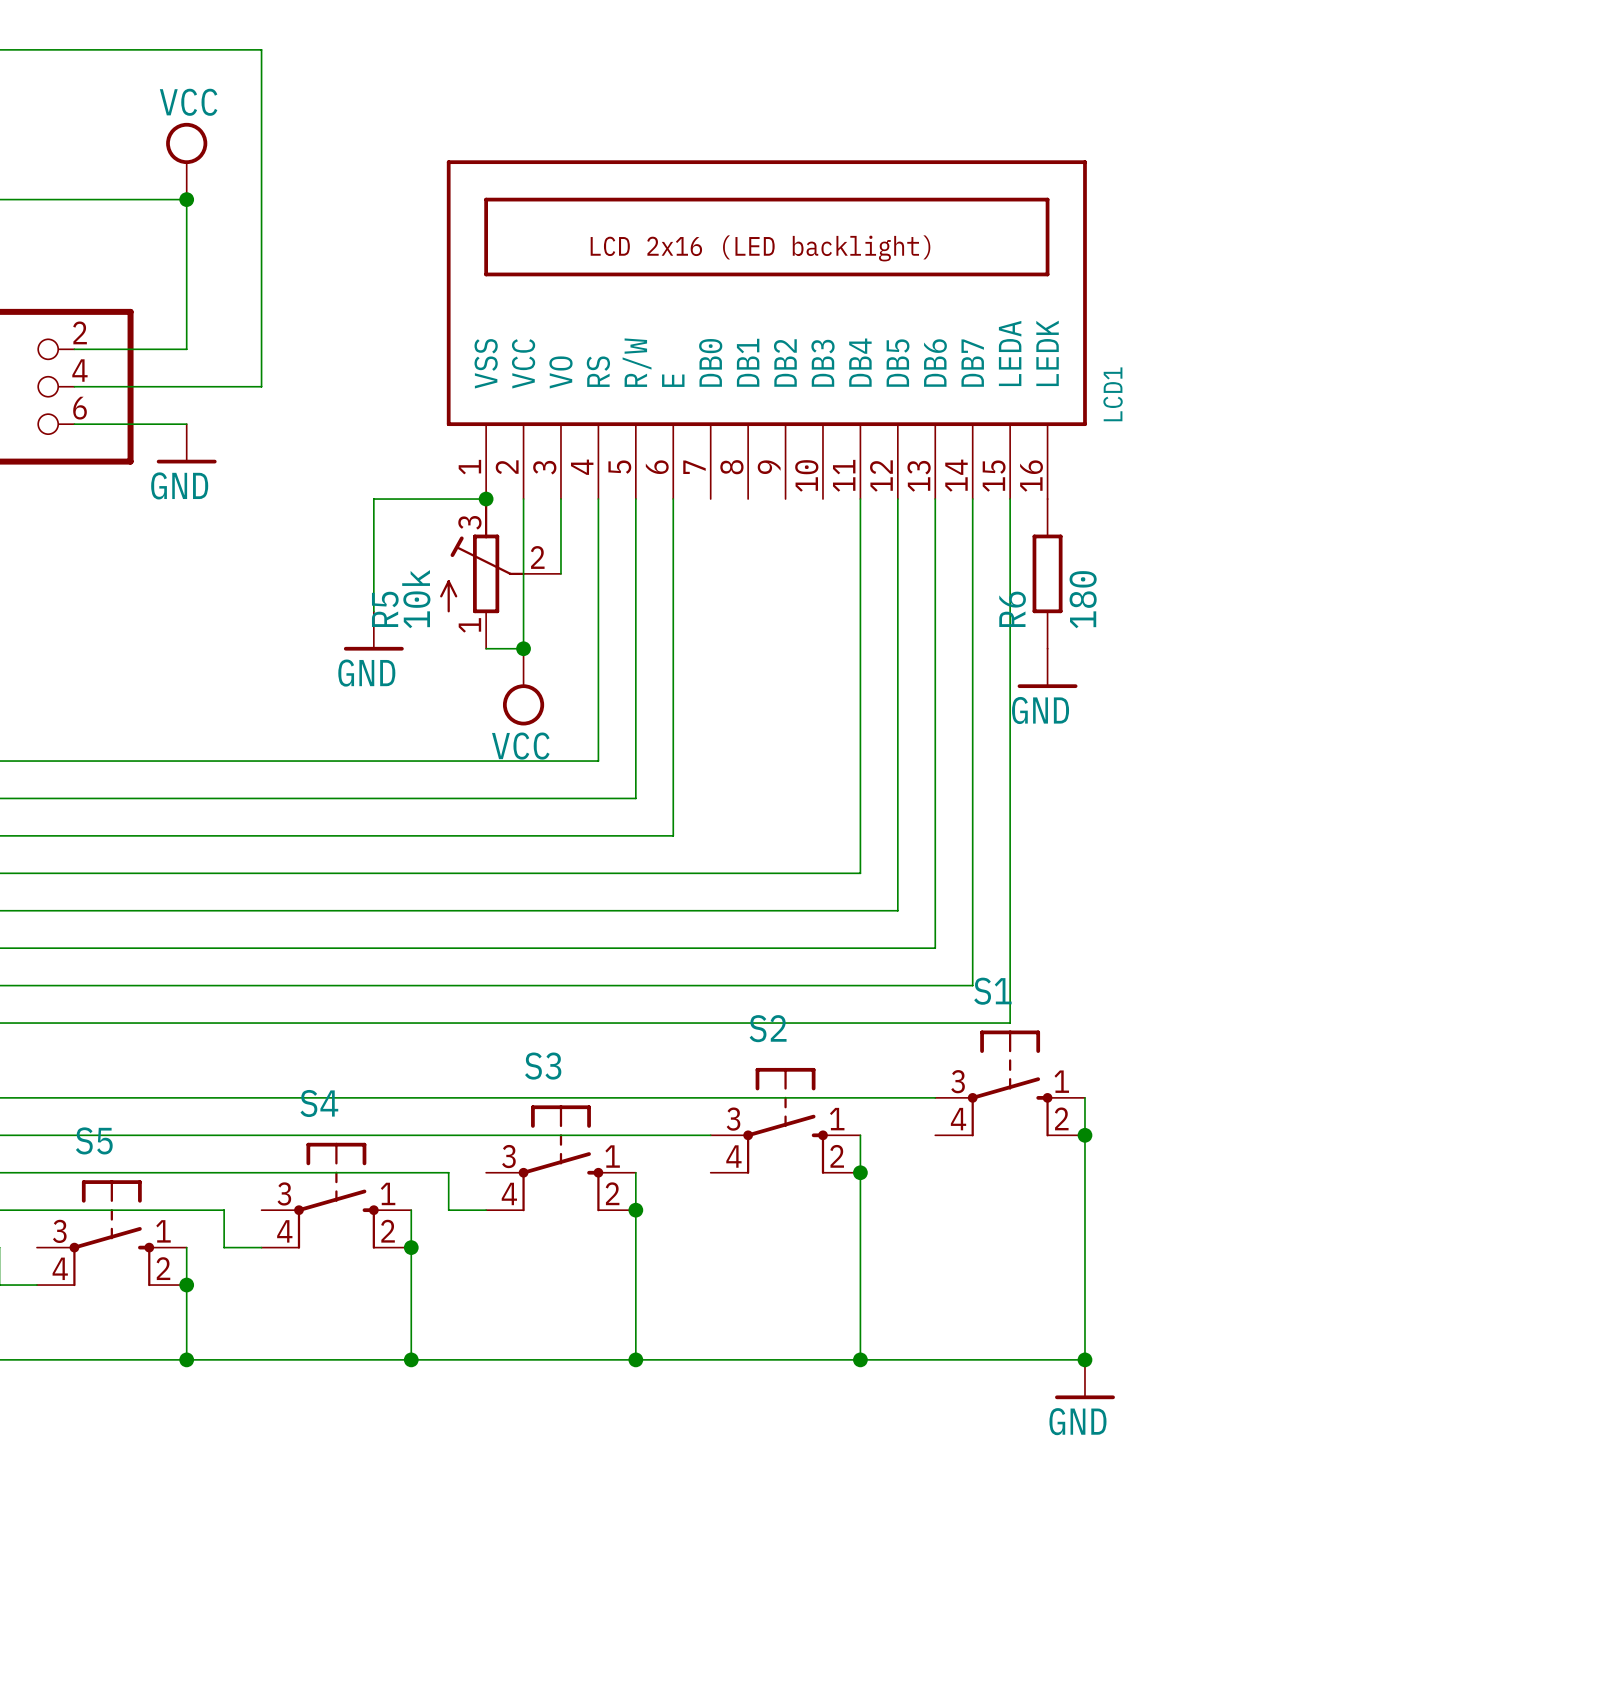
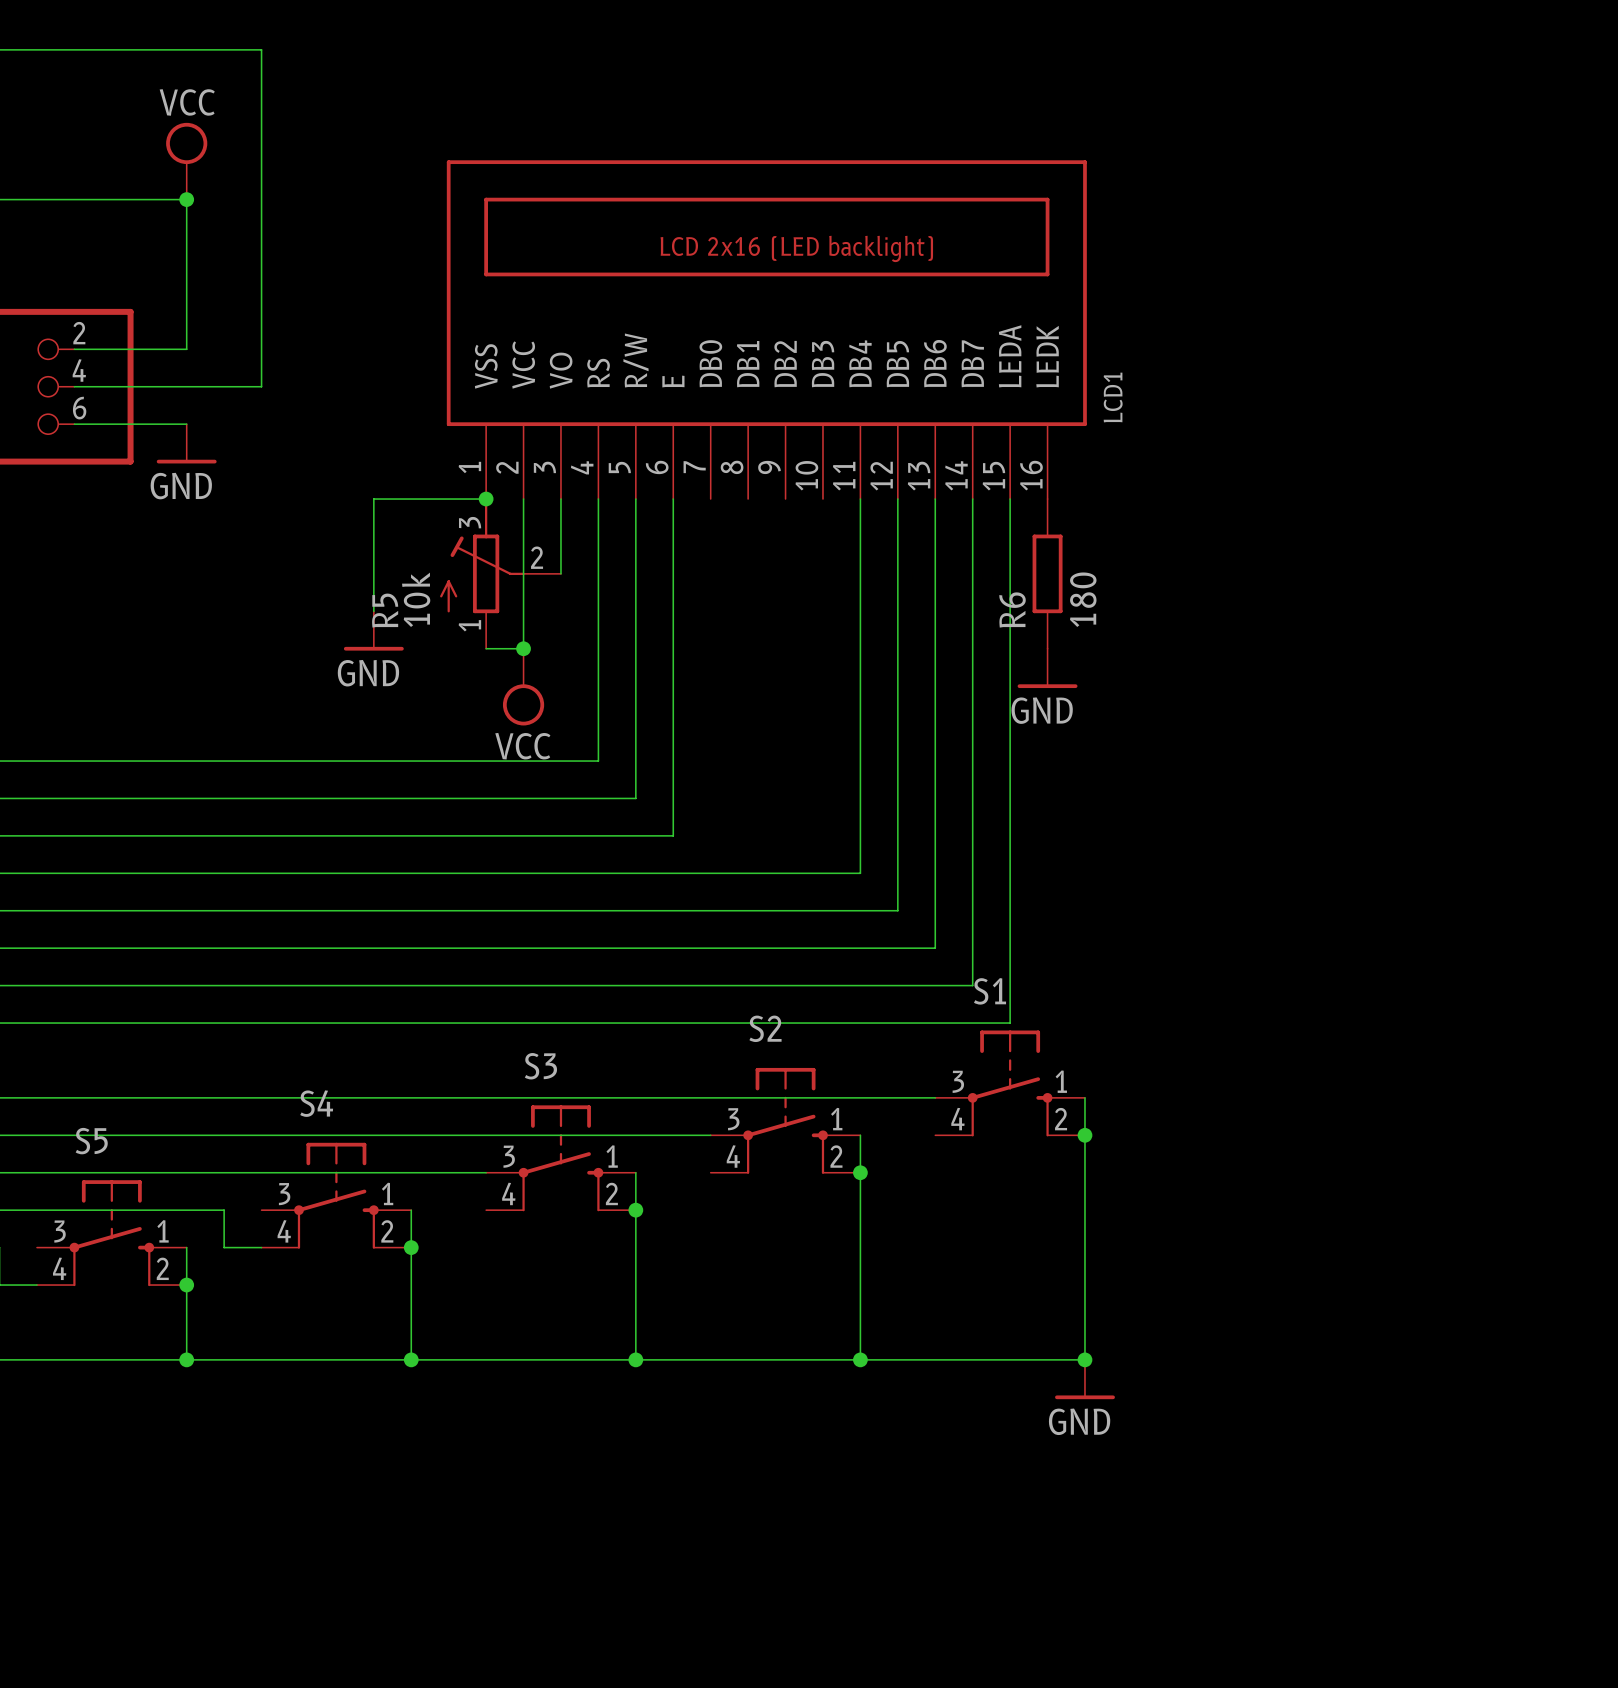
wire: (448, 1172) (448, 1210) (486, 1210) -> (448, 1172) (486, 1172)

